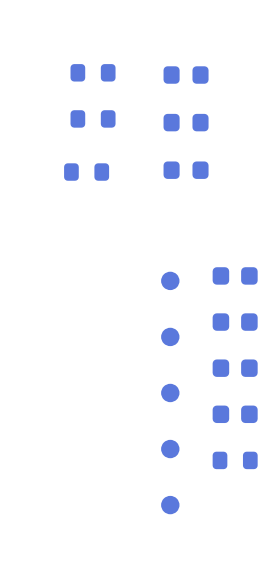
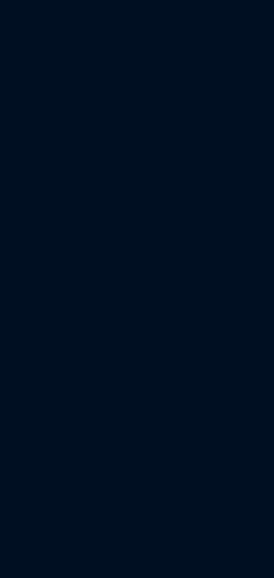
part: (93, 72) -> none
part: (186, 75) -> none
part: (93, 118) -> none
part: (186, 122) -> none
part: (186, 170) -> none
part: (86, 172) -> none
part: (235, 275) -> none
part: (170, 280) -> none
part: (235, 322) -> none
part: (170, 336) -> none
part: (235, 368) -> none
part: (170, 392) -> none
part: (235, 414) -> none
part: (170, 449) -> none
part: (235, 460) -> none
part: (170, 505) -> none

